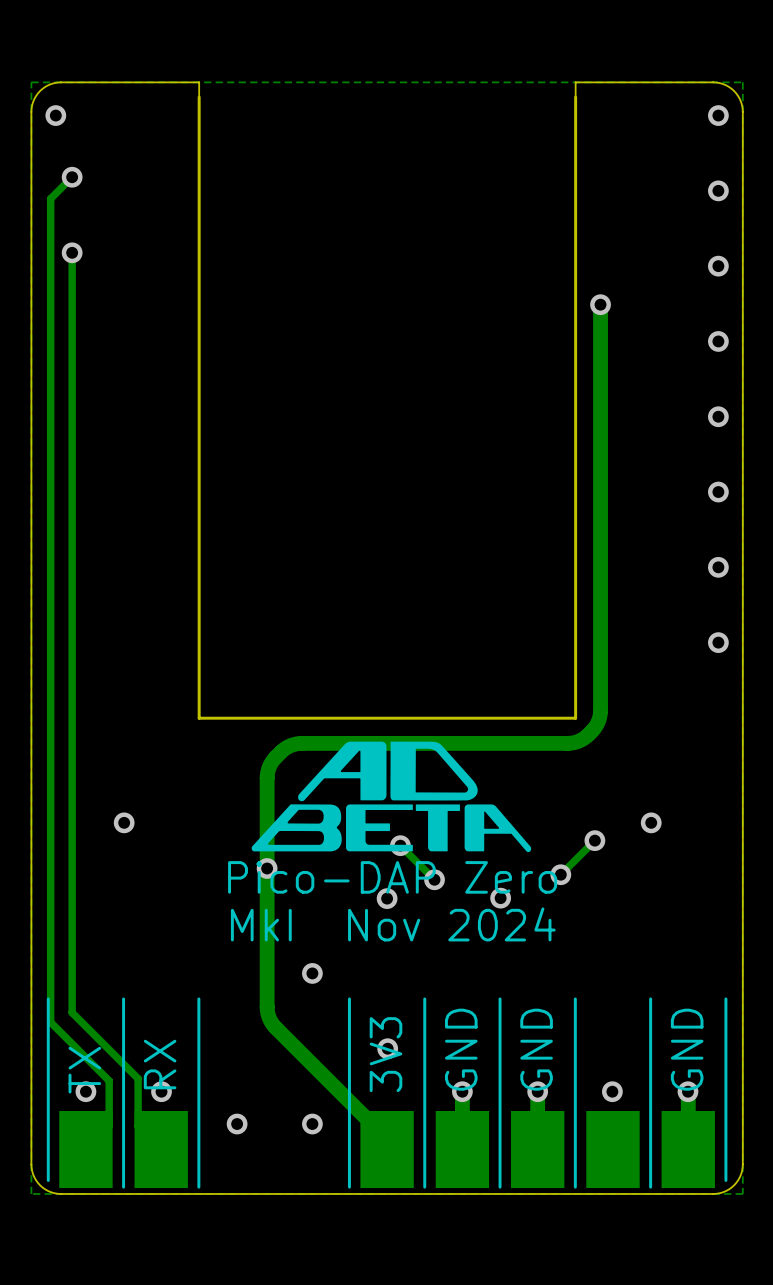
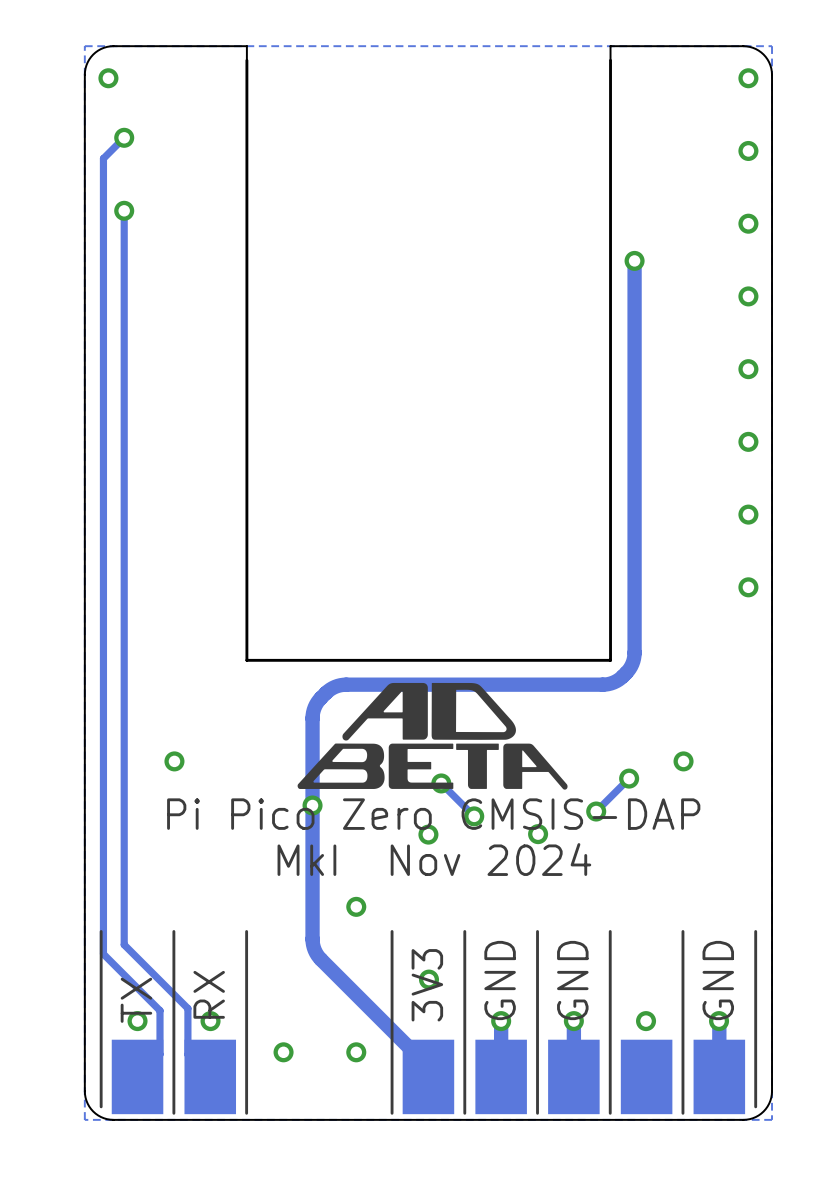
text: Pico-DAP Zero (392, 877) -> Pi Pico Zero CMSIS-DAP (433, 814)

